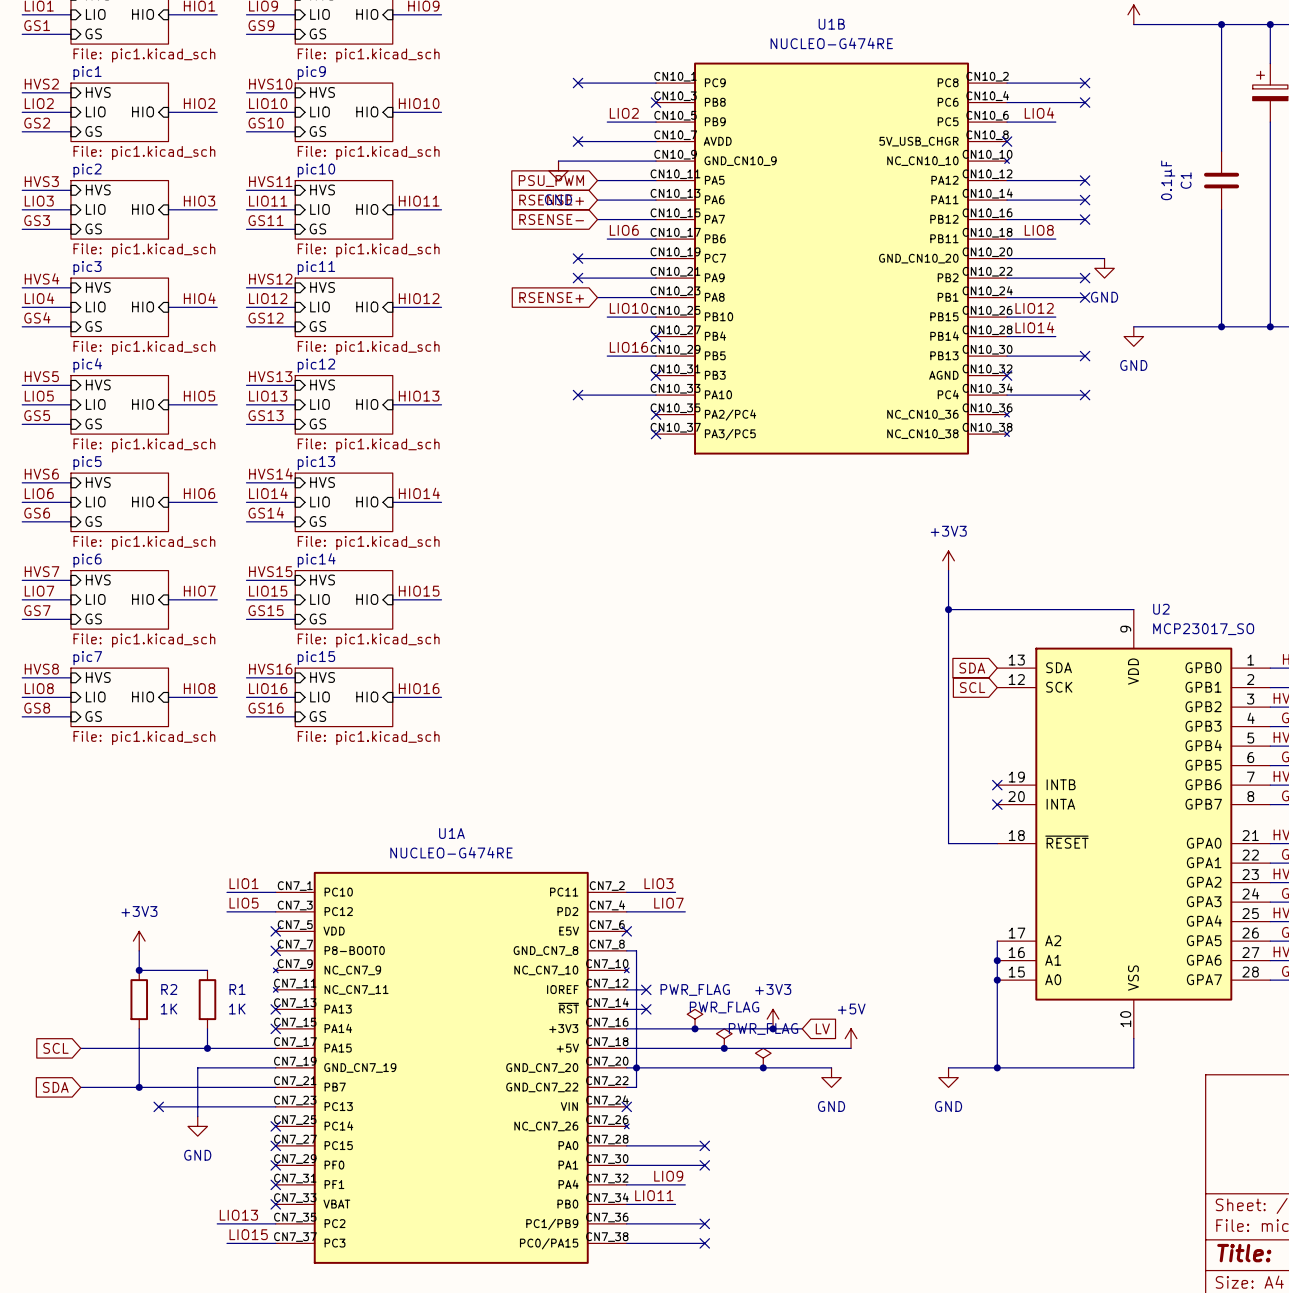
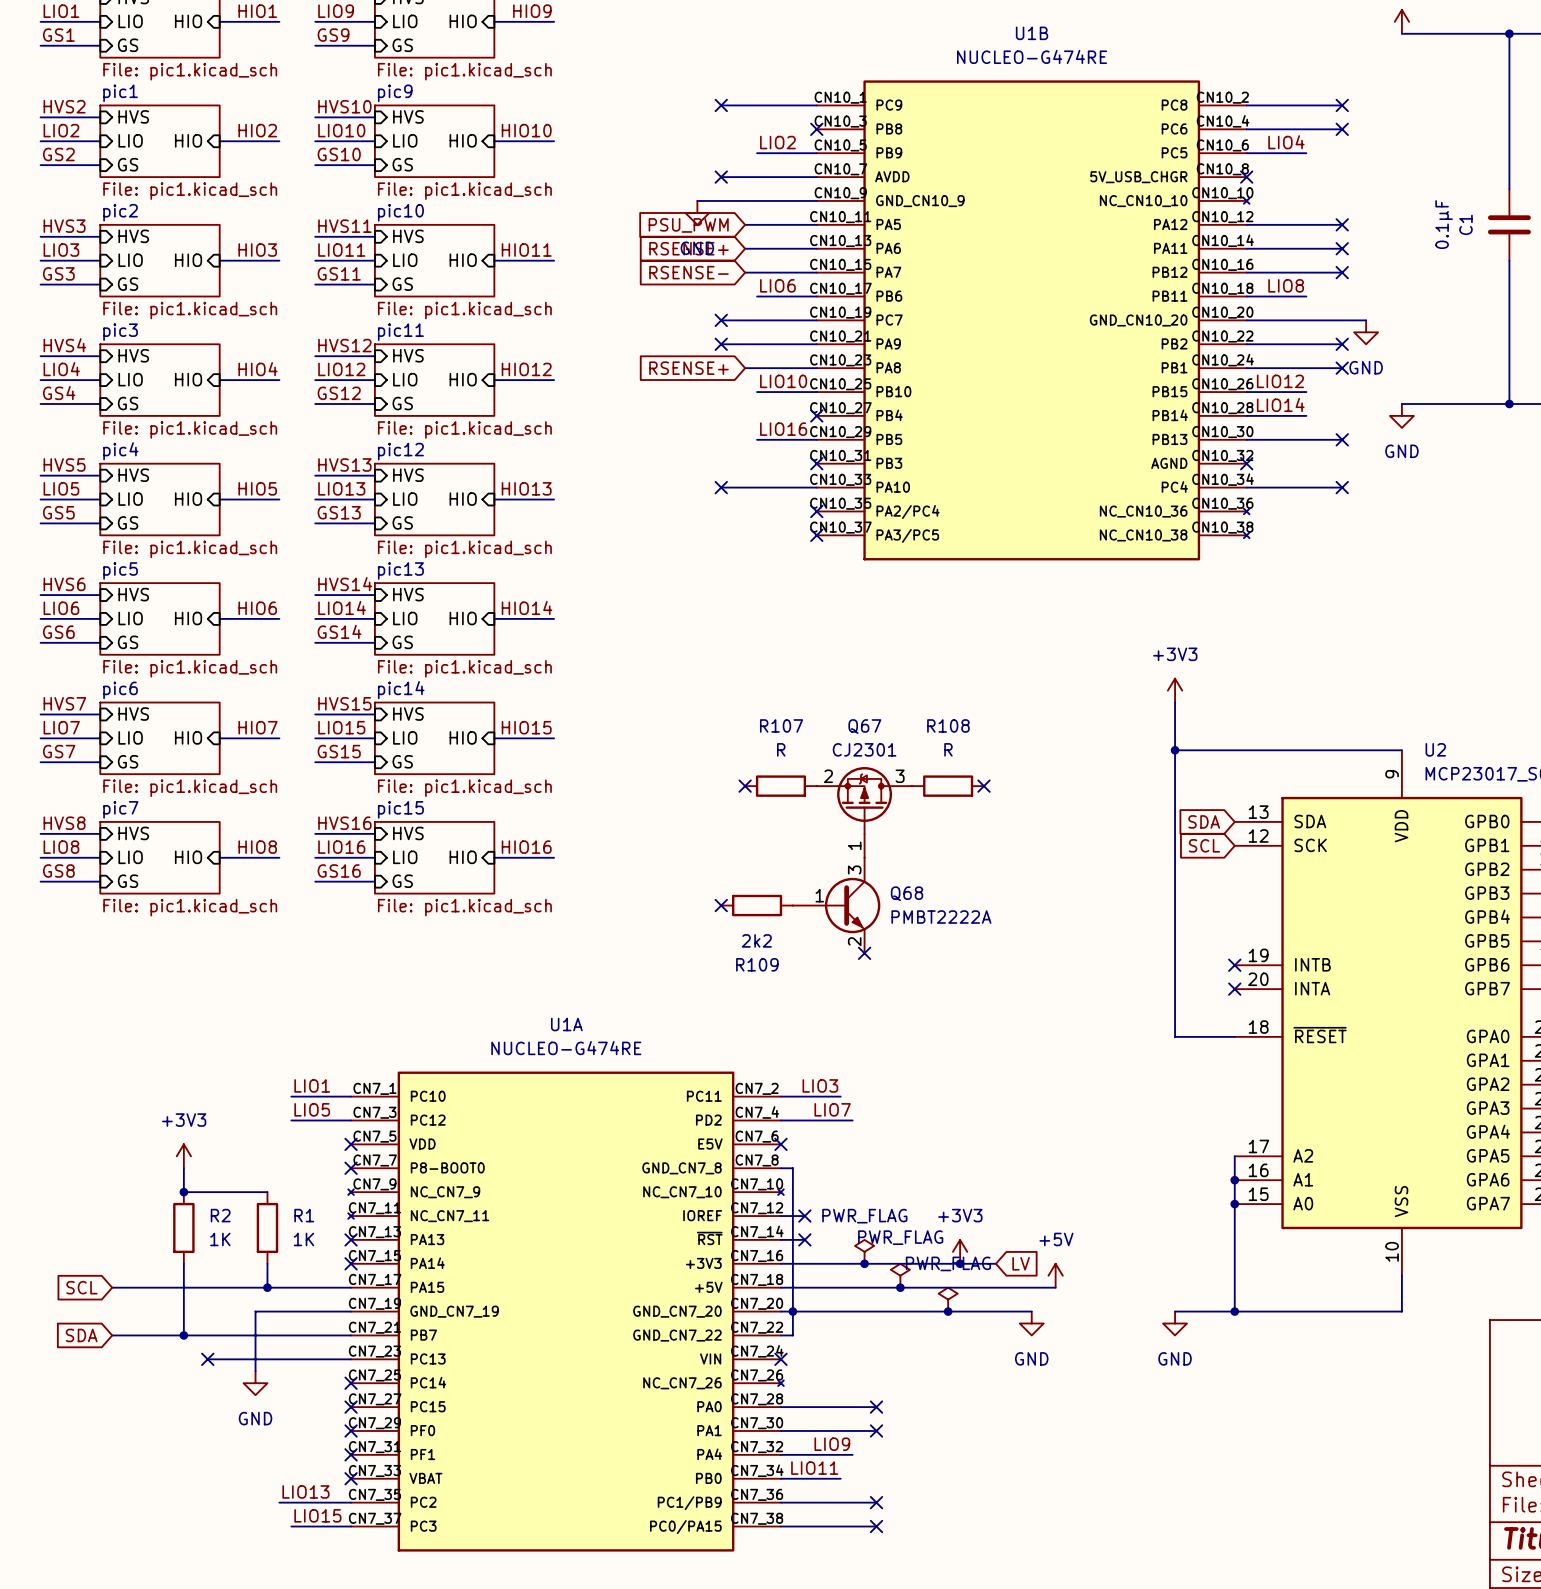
no-connect mark: none -> (745, 786)
R107: none -> R (780, 786)
R108: none -> R (948, 786)
no-connect mark: none -> (983, 786)
Q67: none -> CJ2301 (864, 812)
no-connect mark: none -> (721, 905)
R109: none -> 2k2 (757, 905)
Q68: none -> PMBT2222A (836, 905)
no-connect mark: none -> (864, 953)

